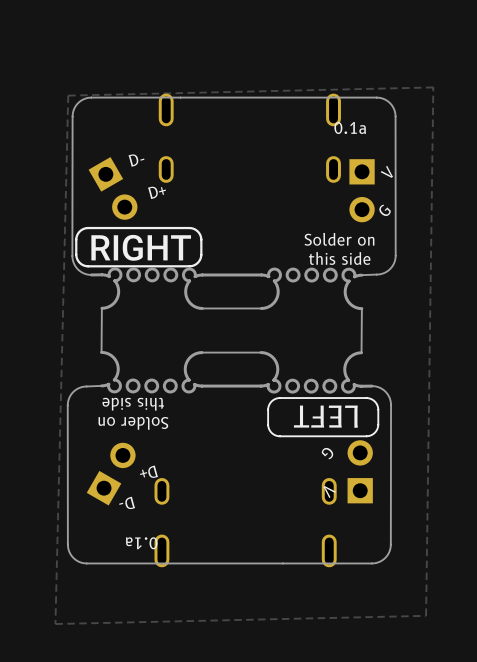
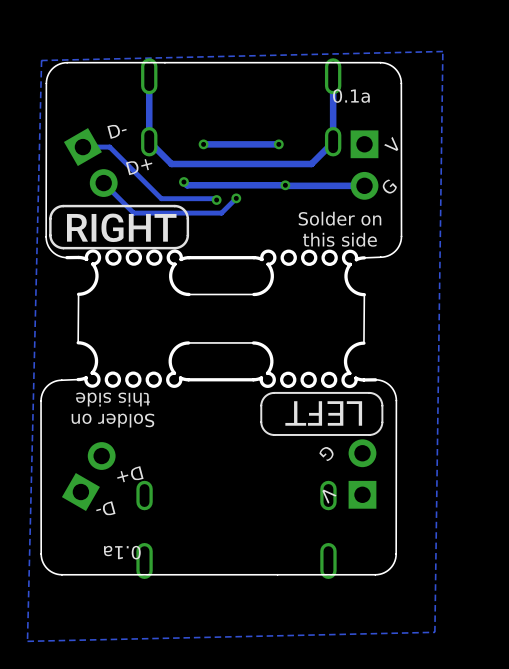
track: none -> (333, 76) (333, 142) (311, 164) (171, 164) (149, 141) (149, 76)
via: none -> (203, 144)
track: none -> (278, 144) (203, 144)
via: none -> (278, 144)
track: none -> (82, 147) (109, 147) (161, 198) (216, 200)
track: none -> (183, 182) (187, 185) (364, 185)
via: none -> (183, 182)
track: none -> (103, 183) (133, 213) (221, 213) (236, 198)
via: none -> (285, 185)
via: none -> (236, 198)
via: none -> (216, 200)

